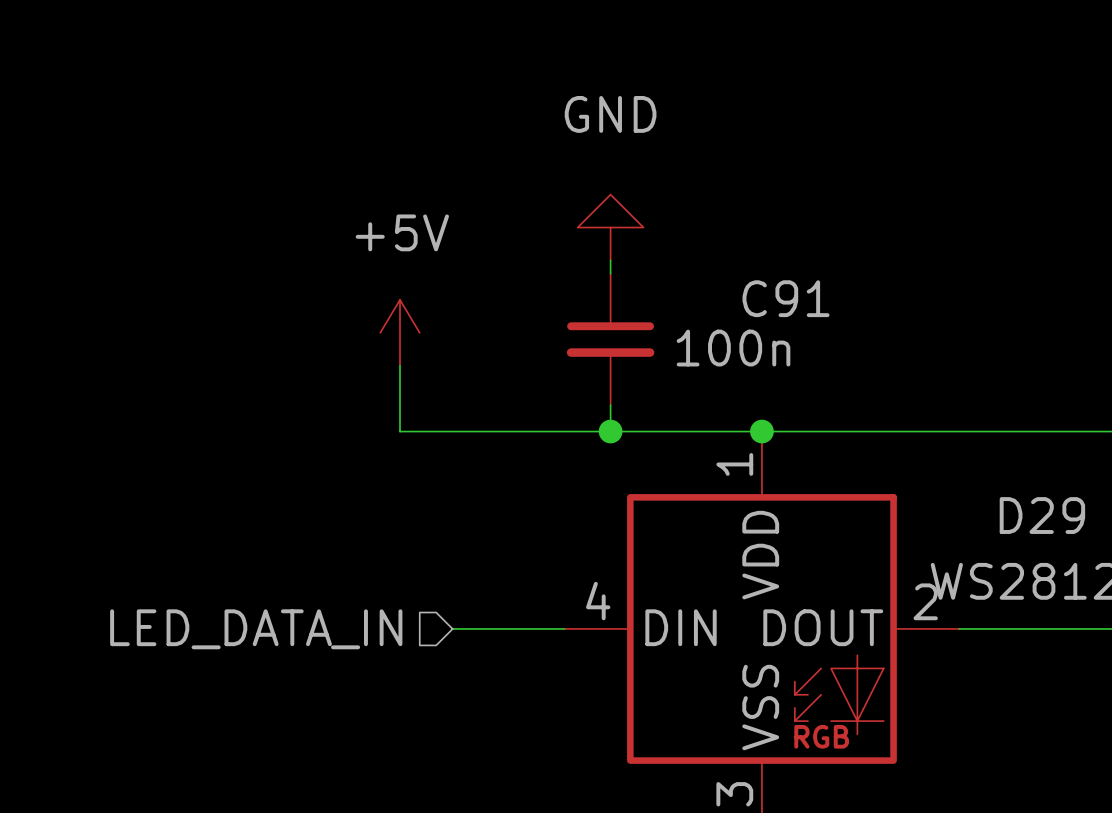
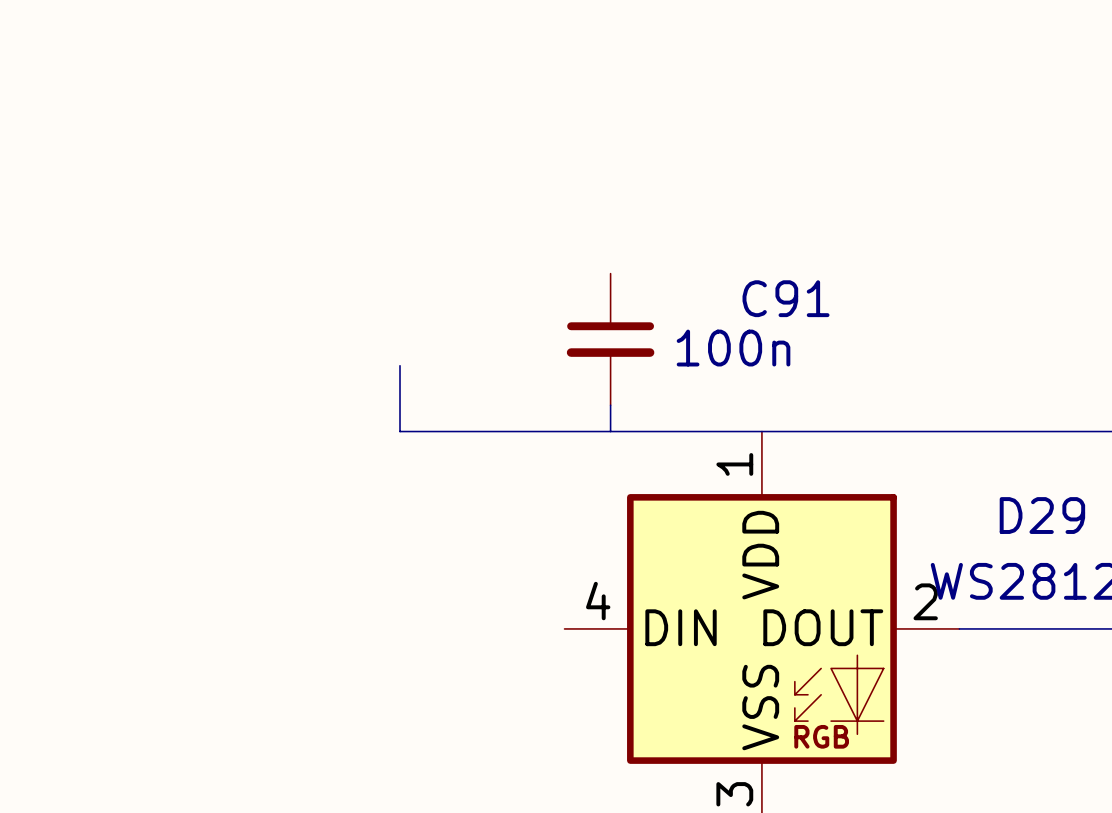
power symbol: GND (610, 227) -> none
wire: (610, 260) (610, 273) -> none
power symbol: +5V (400, 332) -> none
junction: (610, 431) -> none
junction: (761, 431) -> none
wire: (452, 628) (564, 628) -> none
hierarchical label: LED_DATA_IN (256, 629) -> none

